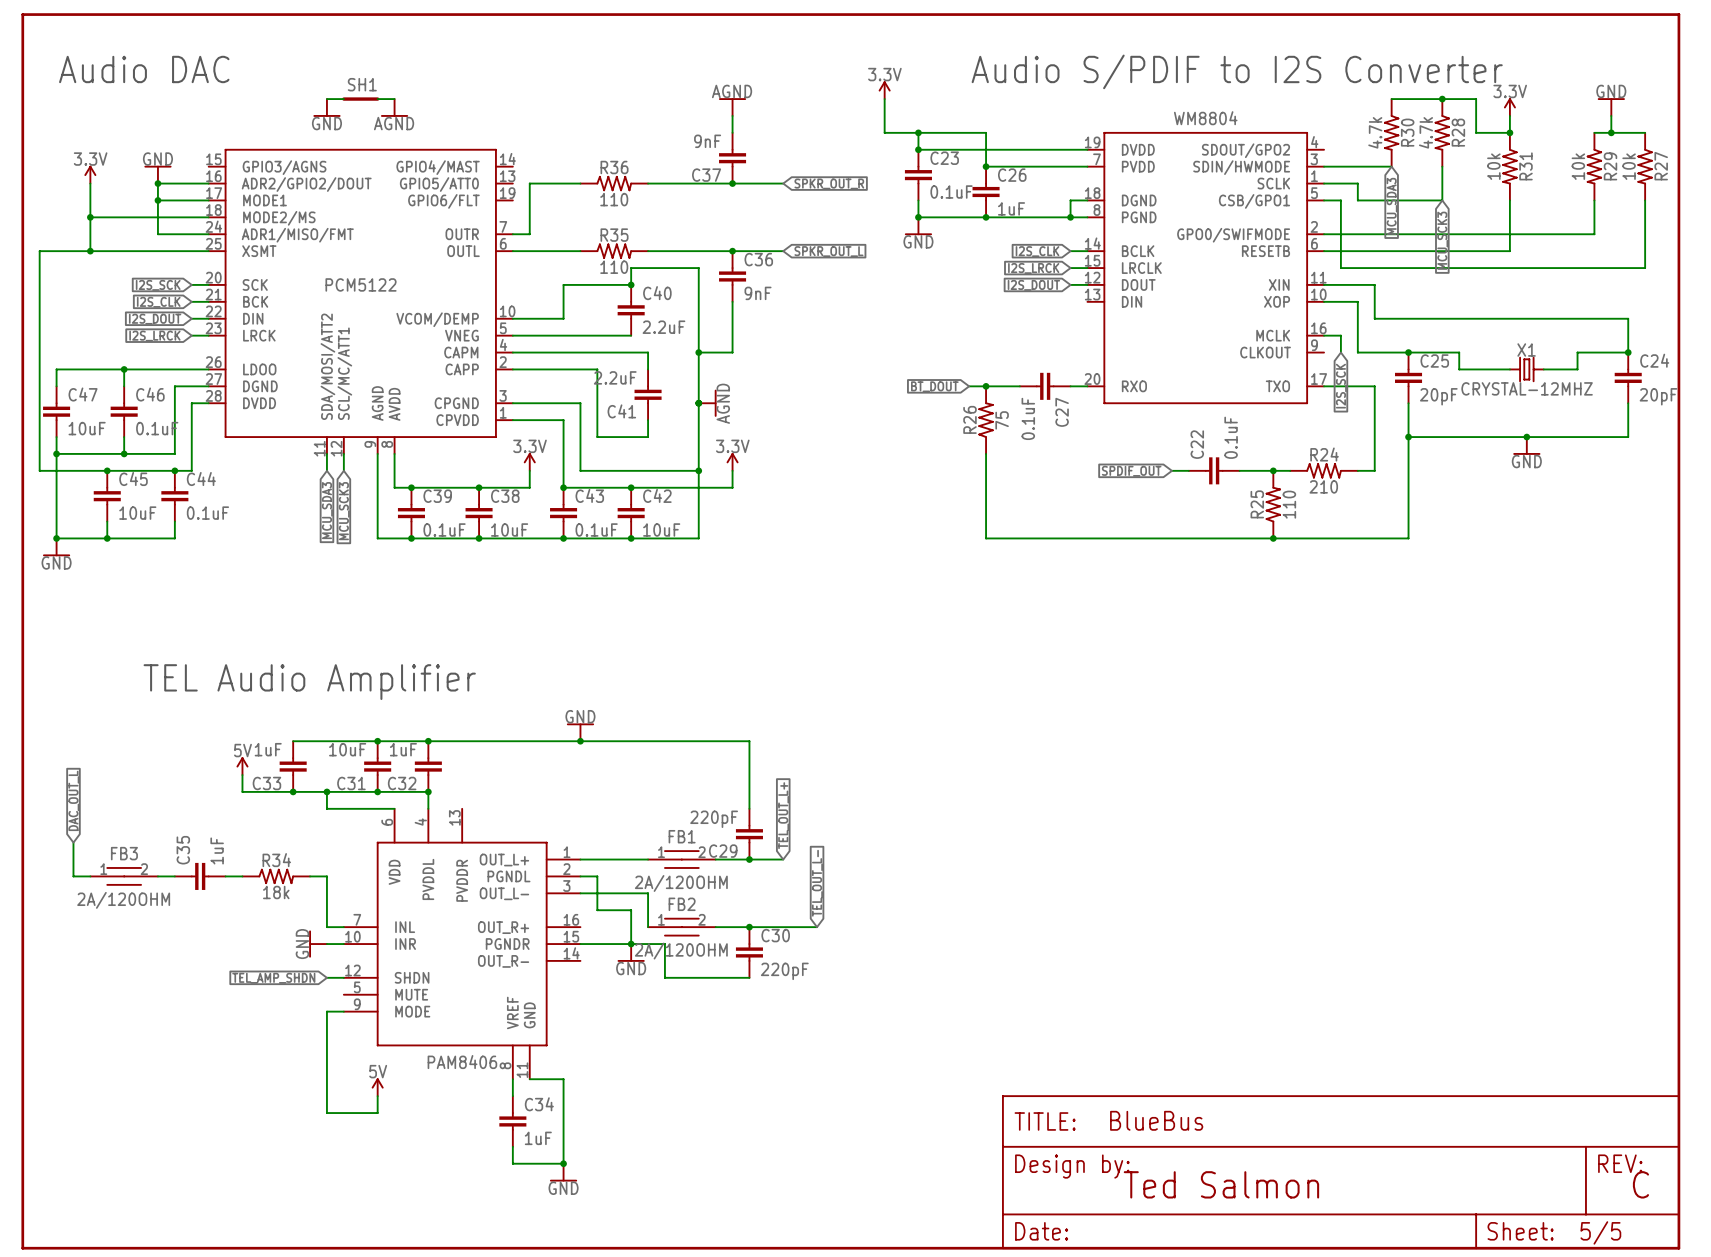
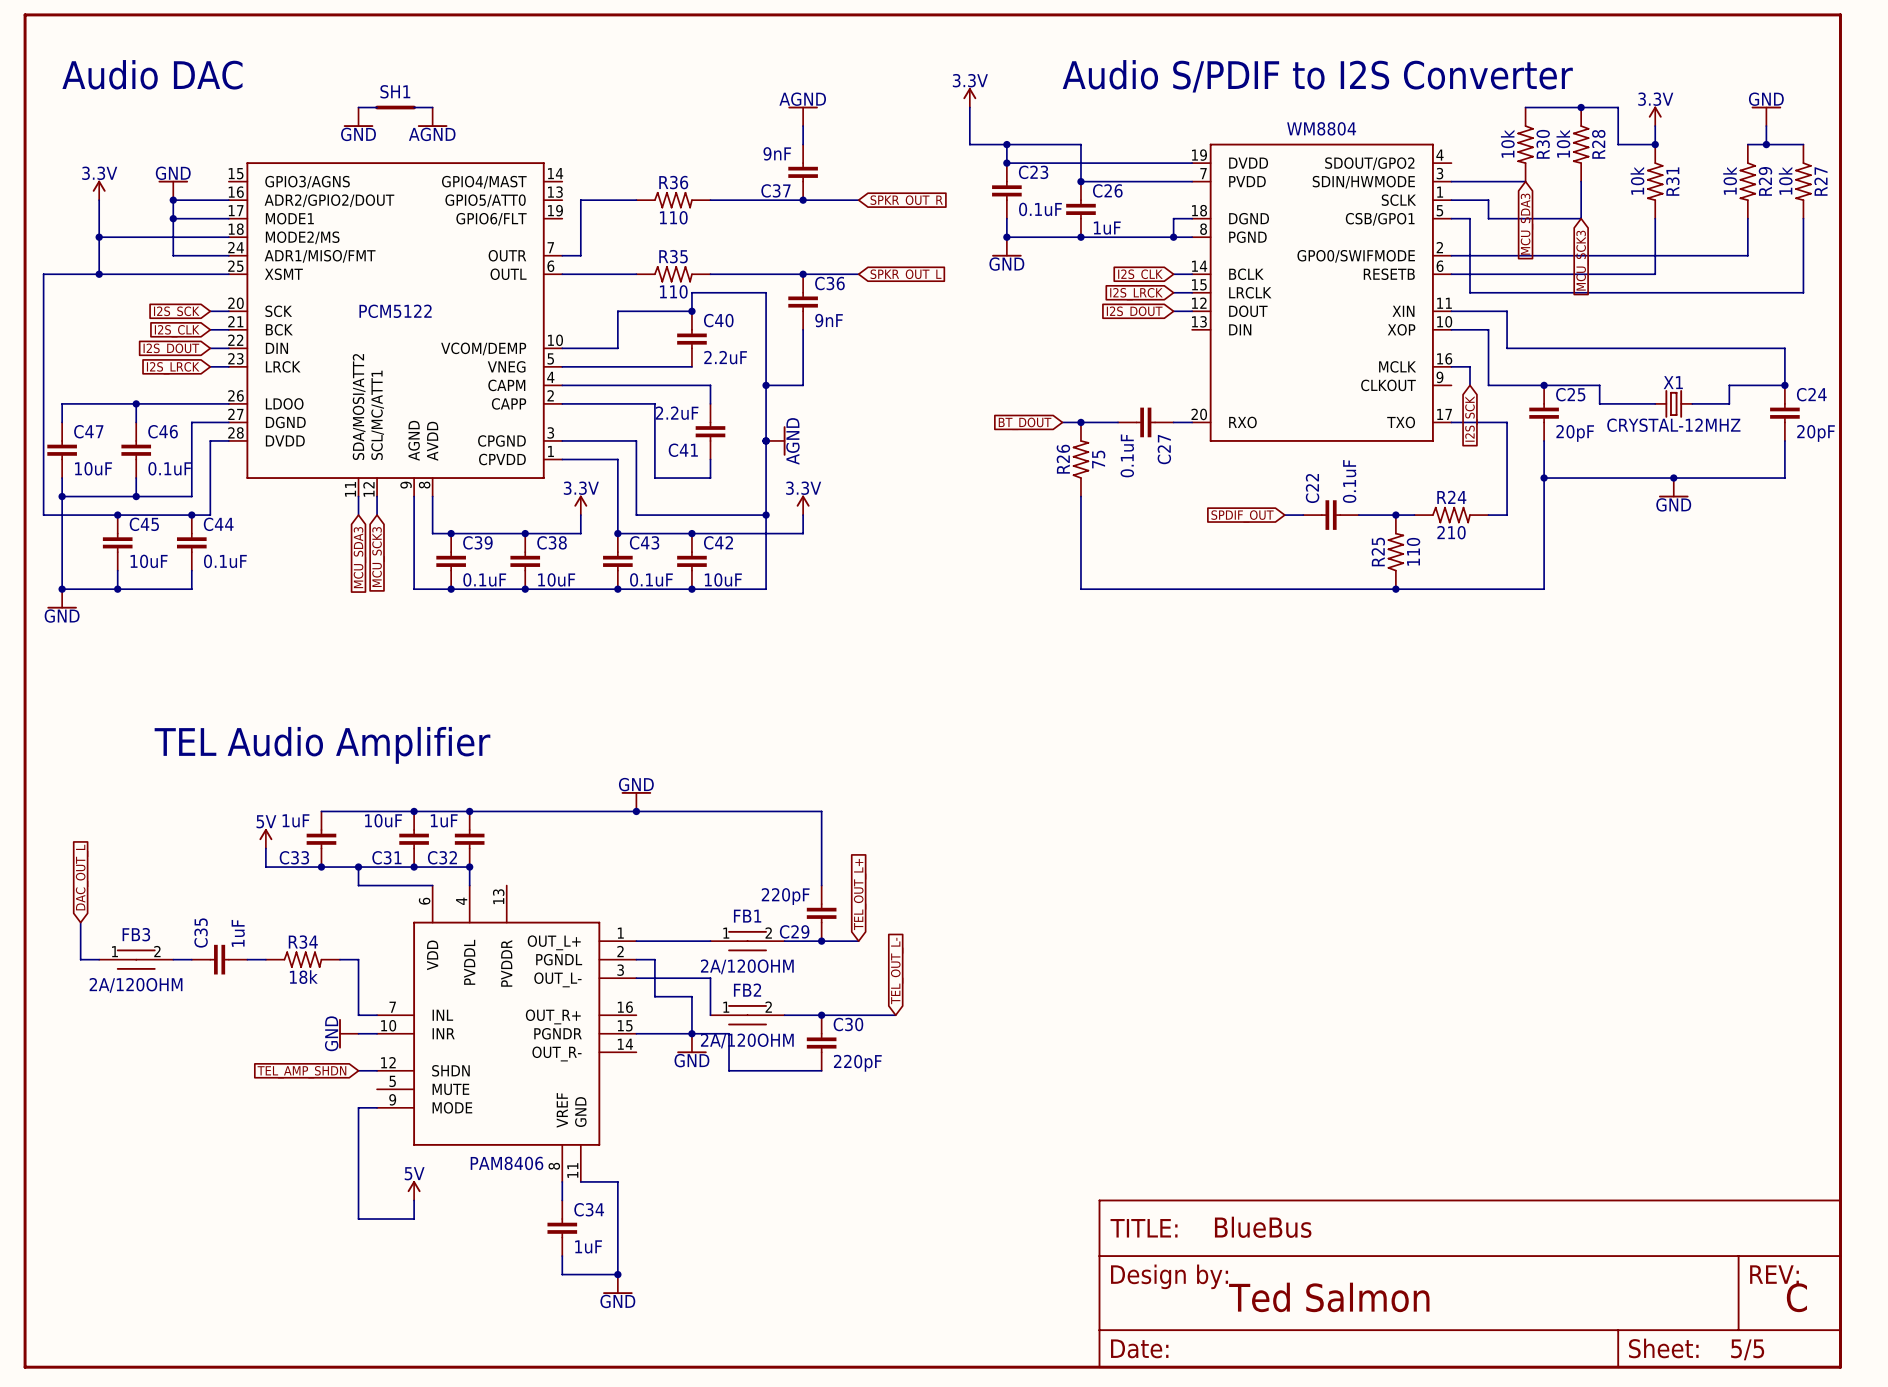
R30 value: 4.7k (1375, 132) -> 10k (1507, 143)
R28 value: 4.7k (1425, 132) -> 10k (1563, 143)

